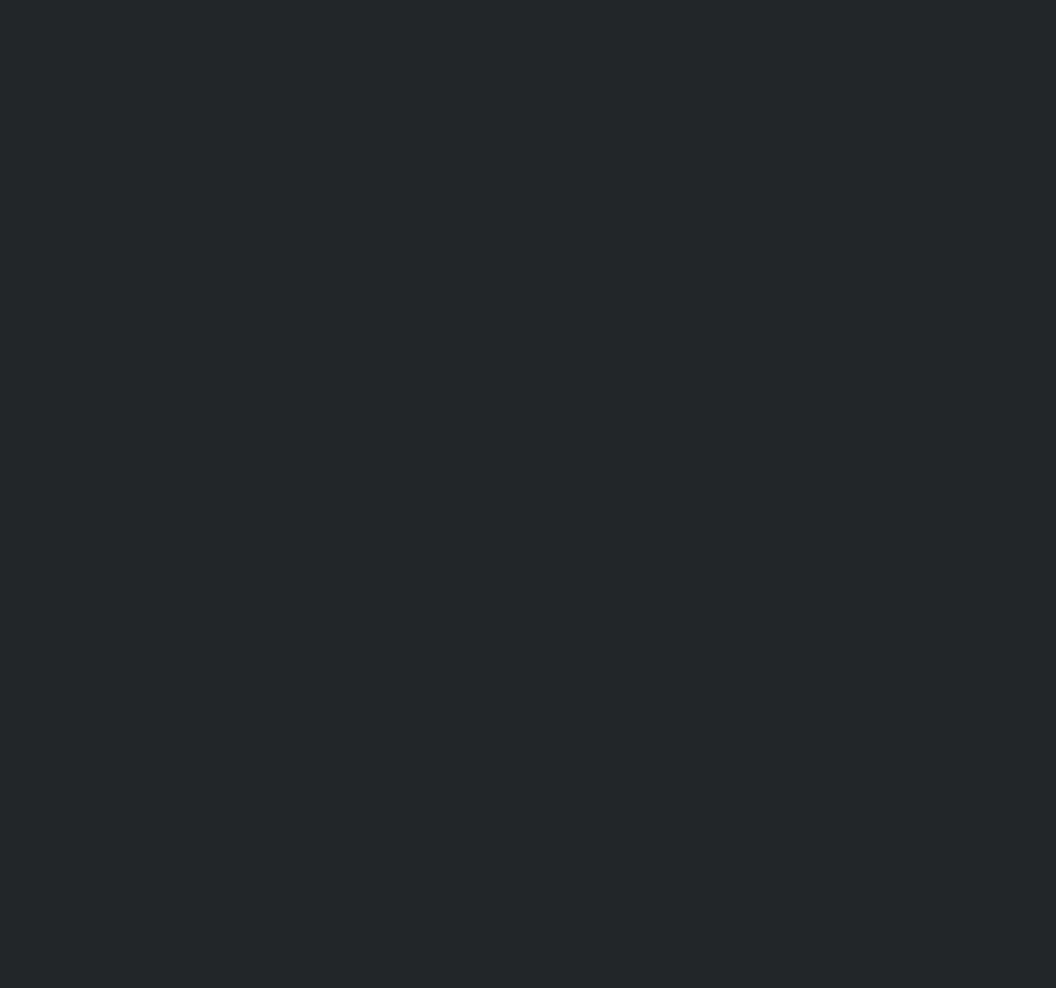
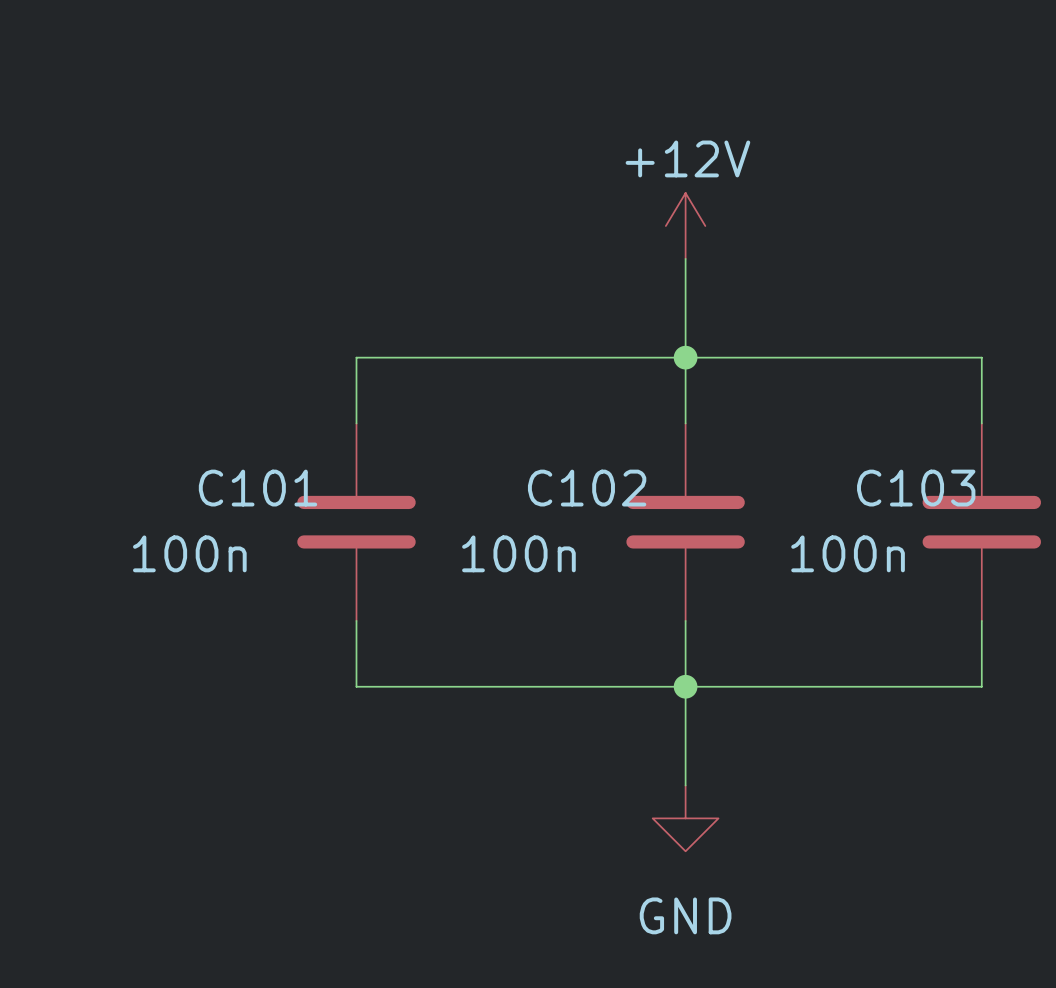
power symbol: none -> +12V (685, 226)
wire: none -> (685, 258) (685, 423)
junction: none -> (685, 357)
wire: none -> (356, 423) (356, 357) (981, 357) (981, 423)
C101: none -> 100n (356, 522)
C102: none -> 100n (685, 522)
C103: none -> 100n (981, 522)
wire: none -> (356, 620) (356, 686) (981, 686) (981, 620)
wire: none -> (685, 620) (685, 785)
junction: none -> (685, 686)
power symbol: none -> GND (685, 818)

